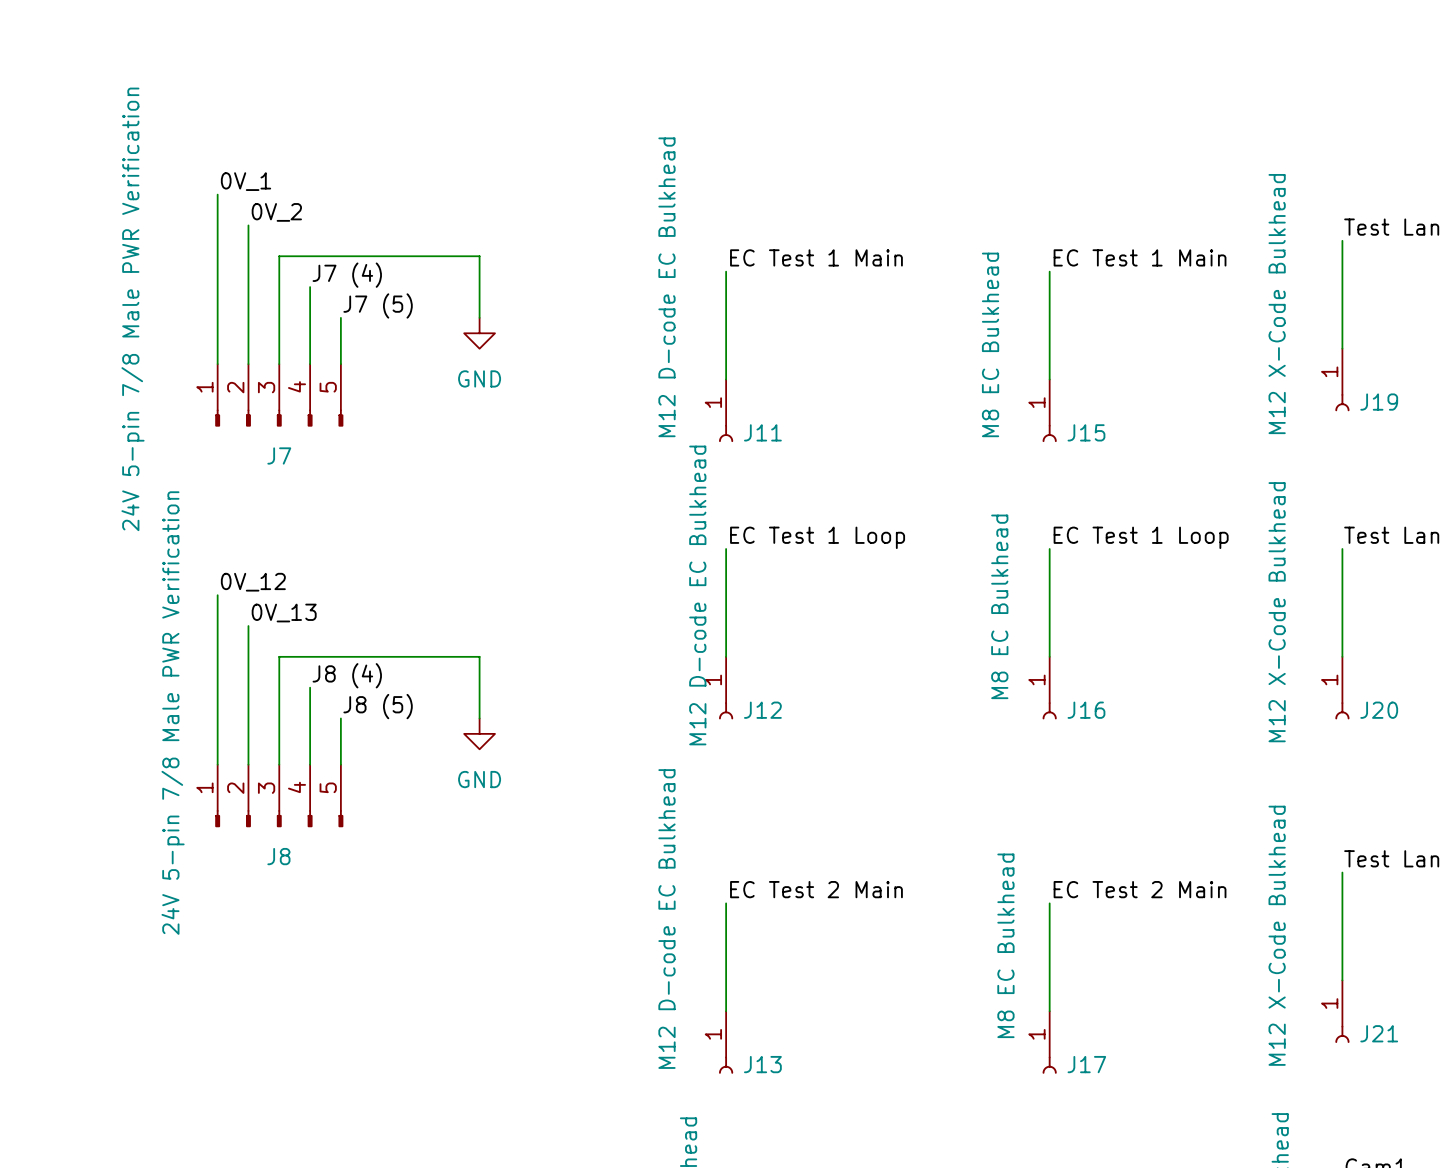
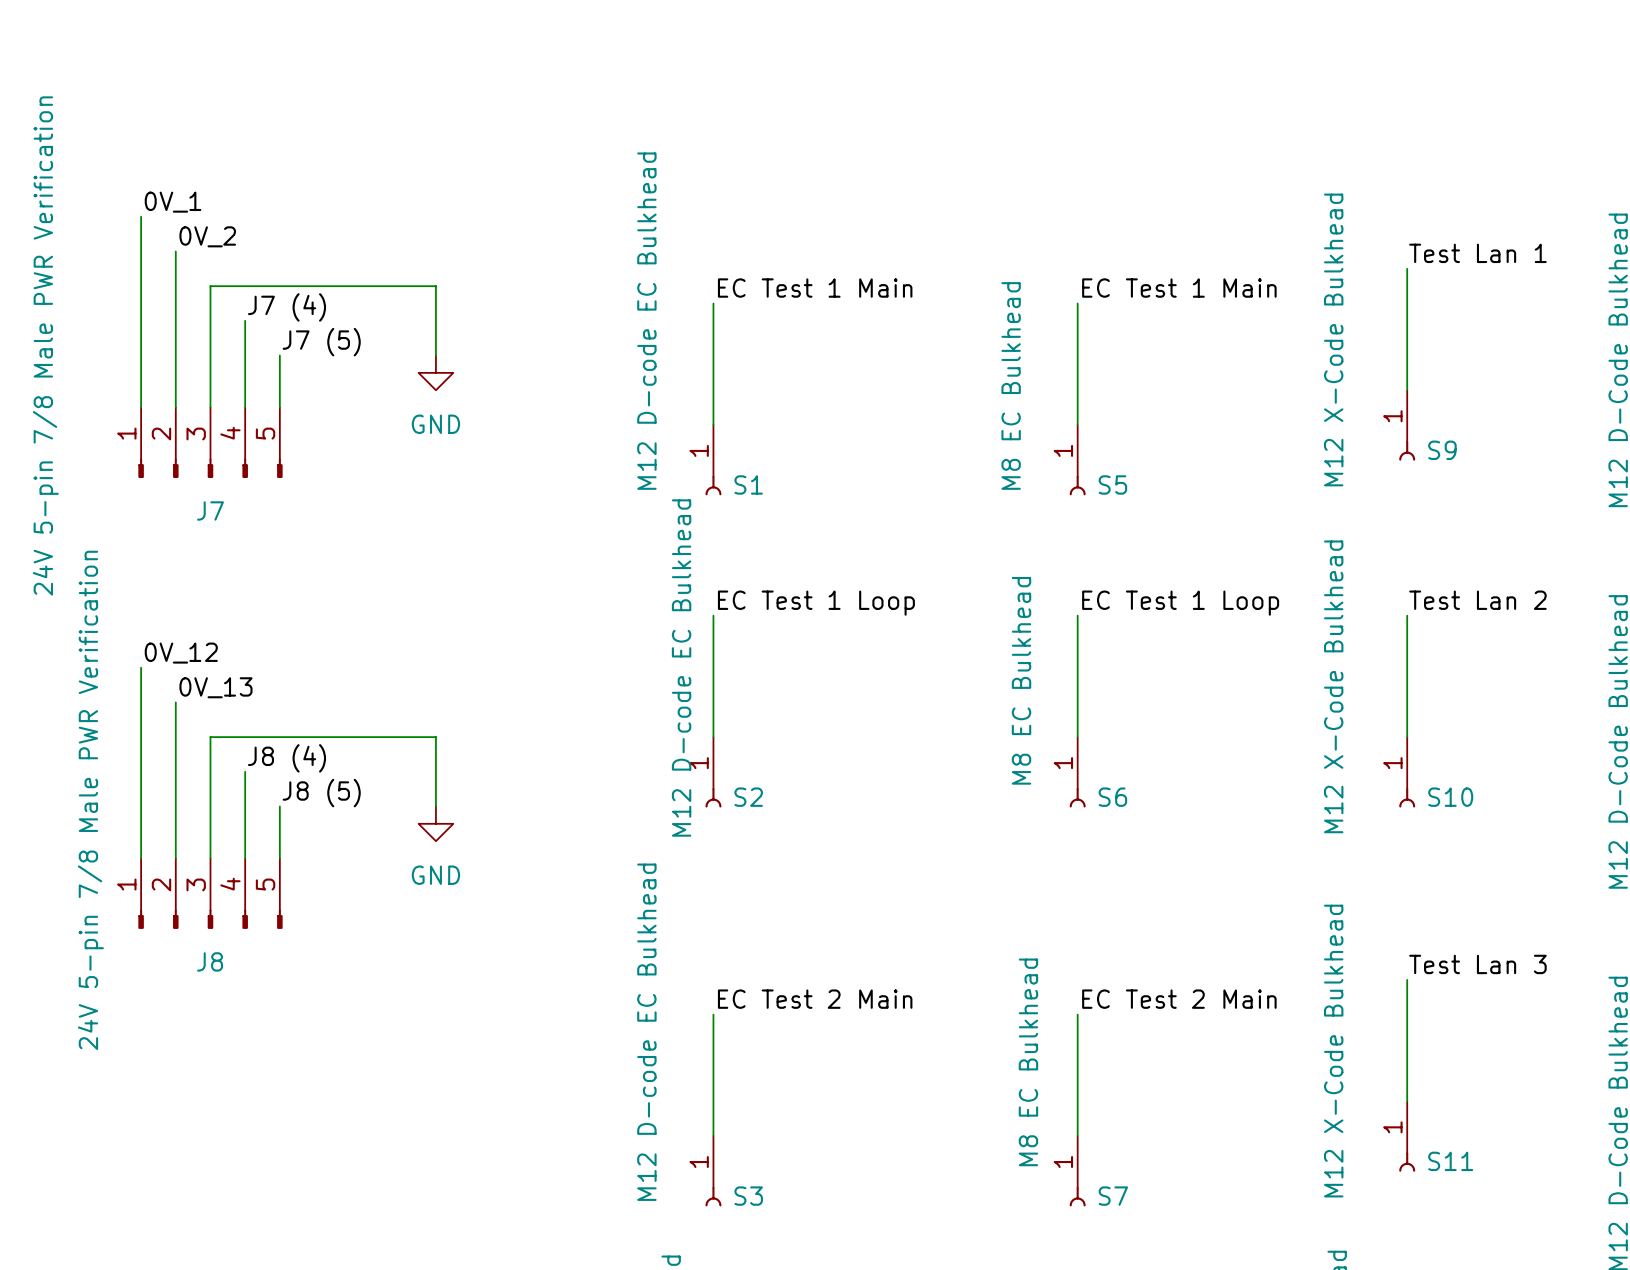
J19 name: J19 (1379, 402) -> S9 (1442, 450)
J11 name: J11 (762, 432) -> S1 (748, 484)
J15 name: J15 (1086, 432) -> S5 (1112, 484)
J12 name: J12 (762, 710) -> S2 (748, 797)
J16 name: J16 (1086, 710) -> S6 (1112, 797)
J20 name: J20 (1379, 710) -> S10 (1450, 797)
J21 name: J21 (1379, 1033) -> S11 (1450, 1161)
J13 name: J13 (762, 1064) -> S3 (748, 1196)
J17 name: J17 (1086, 1064) -> S7 (1113, 1196)

